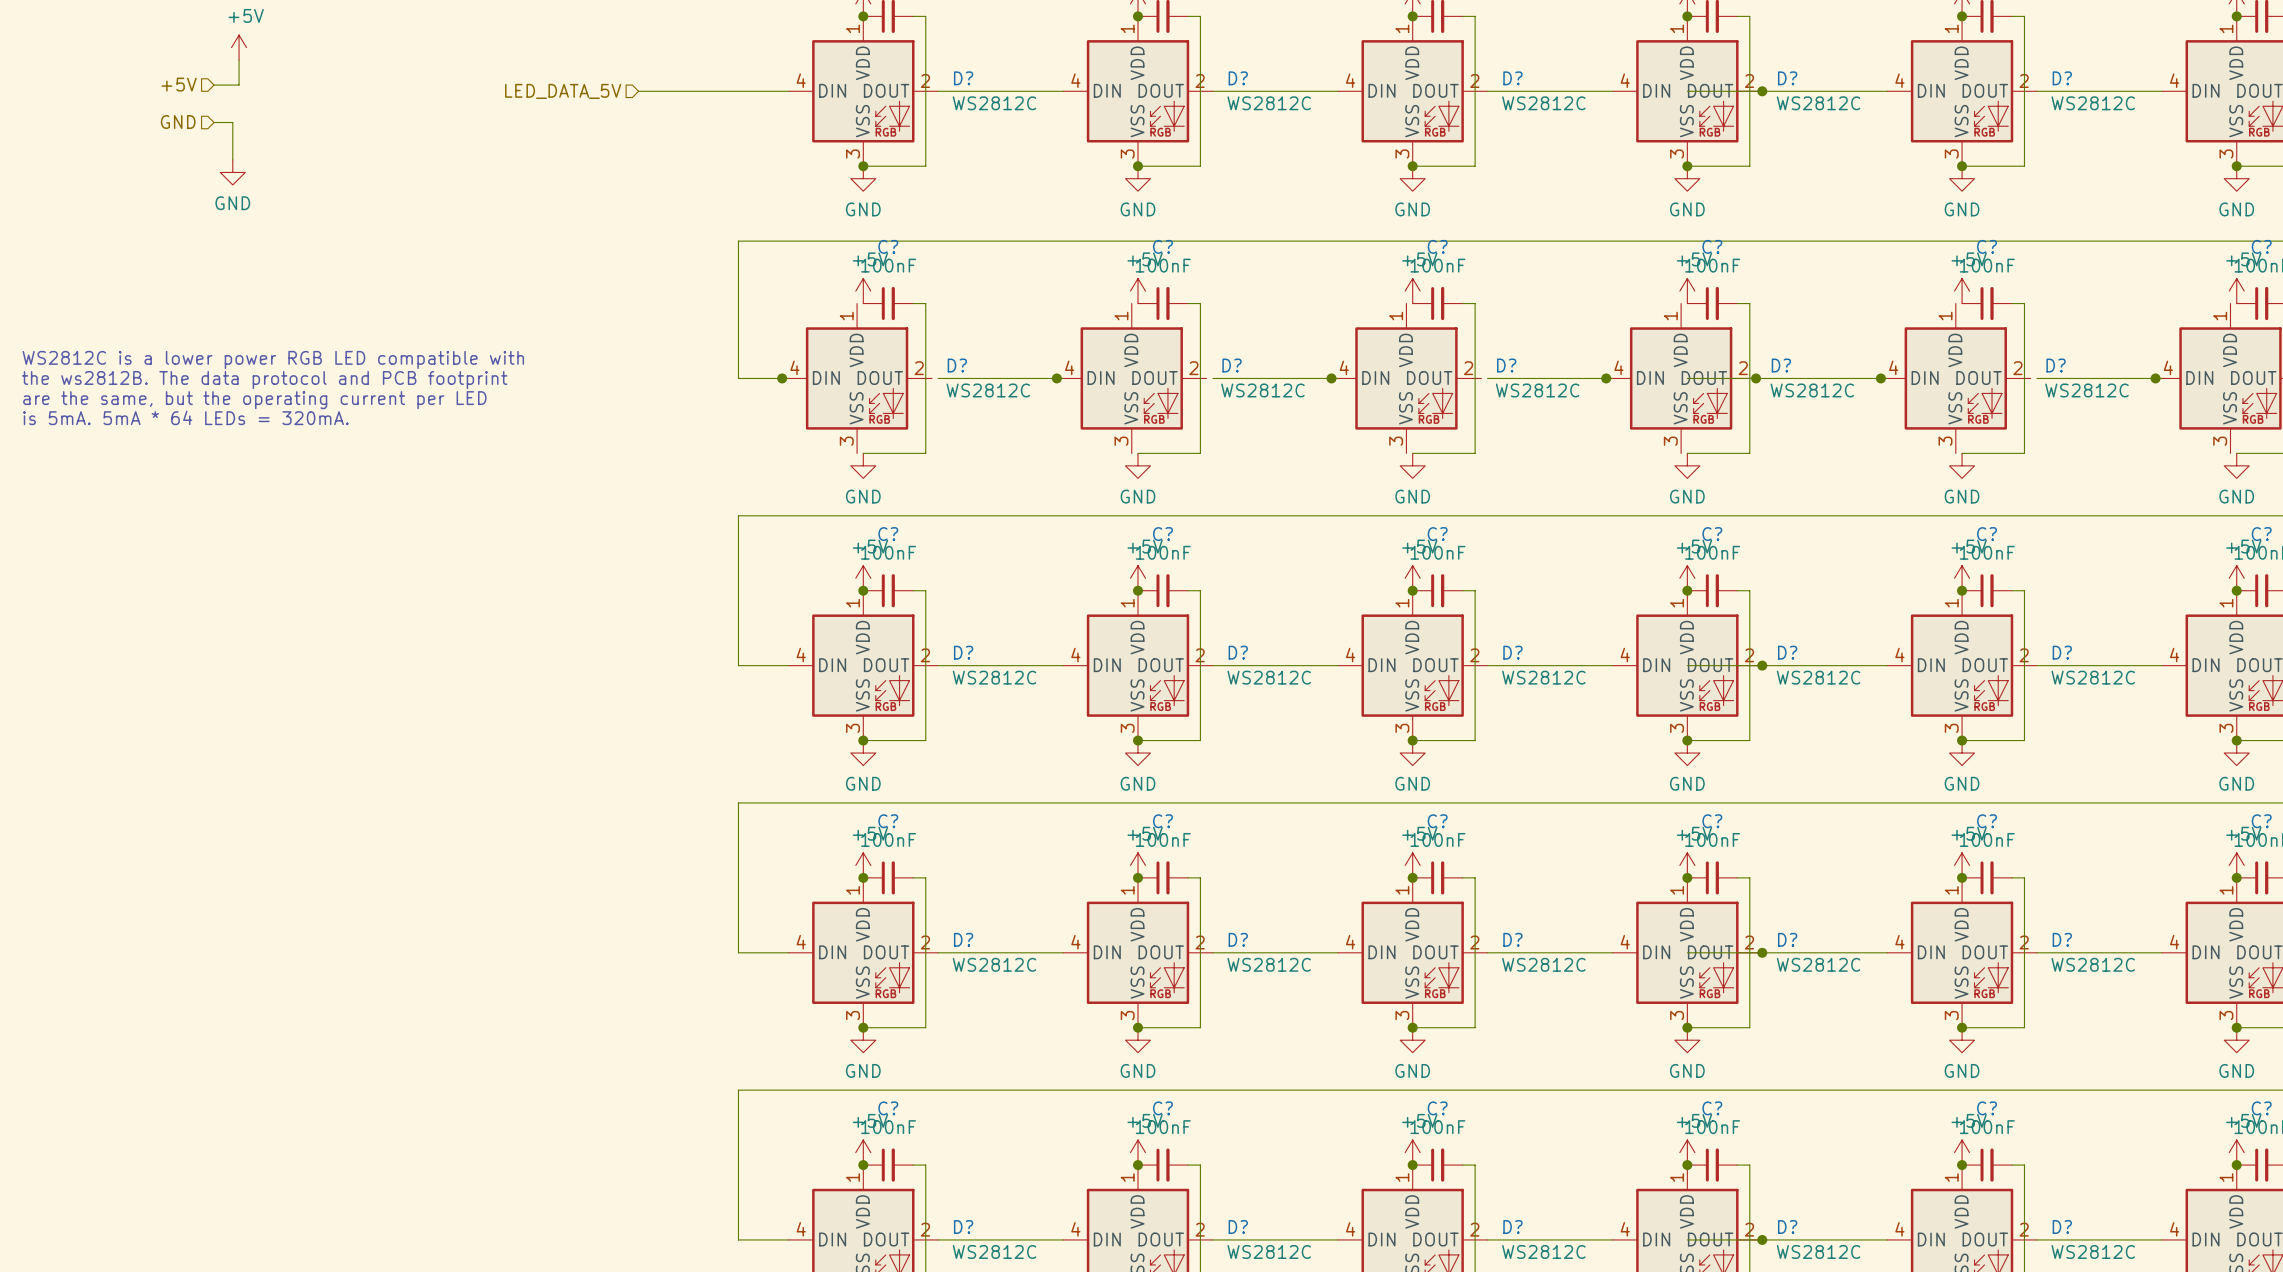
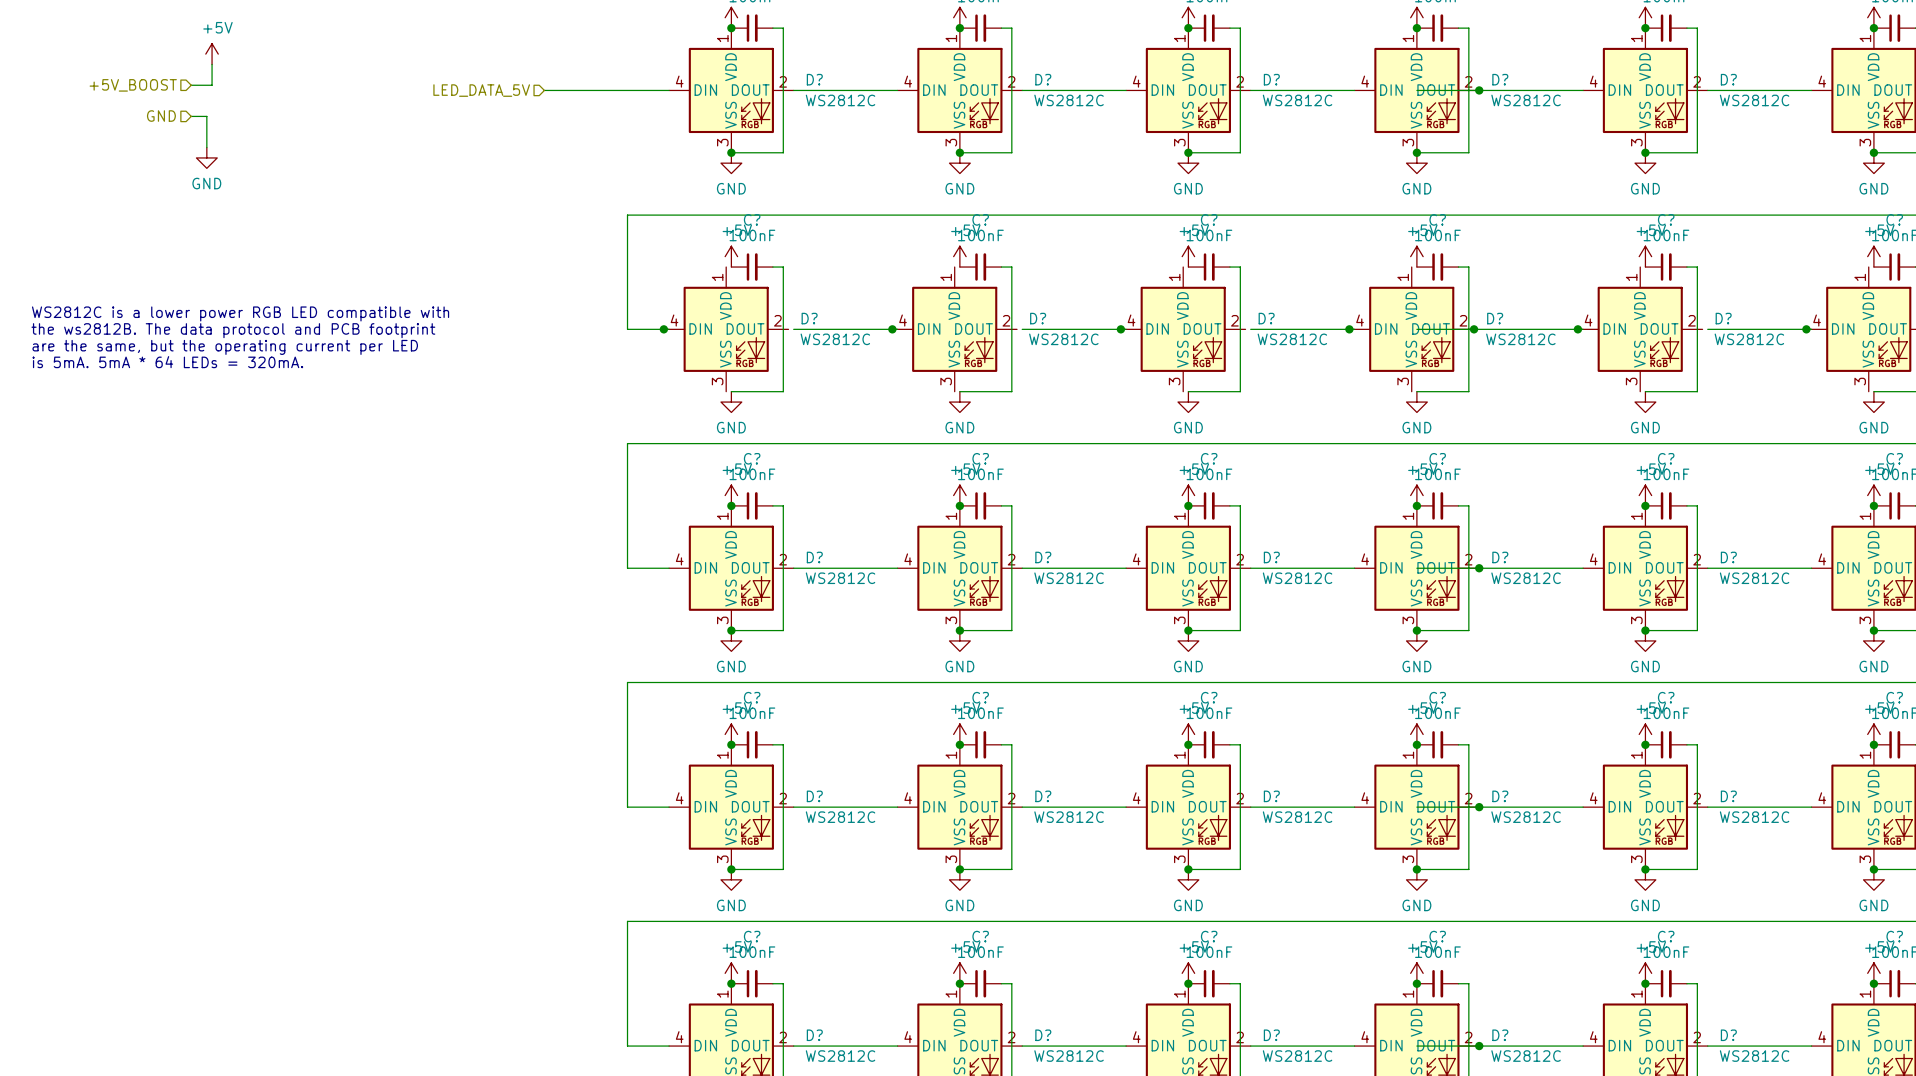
hierarchical label: +5V (179, 84) -> +5V_BOOST (133, 85)

